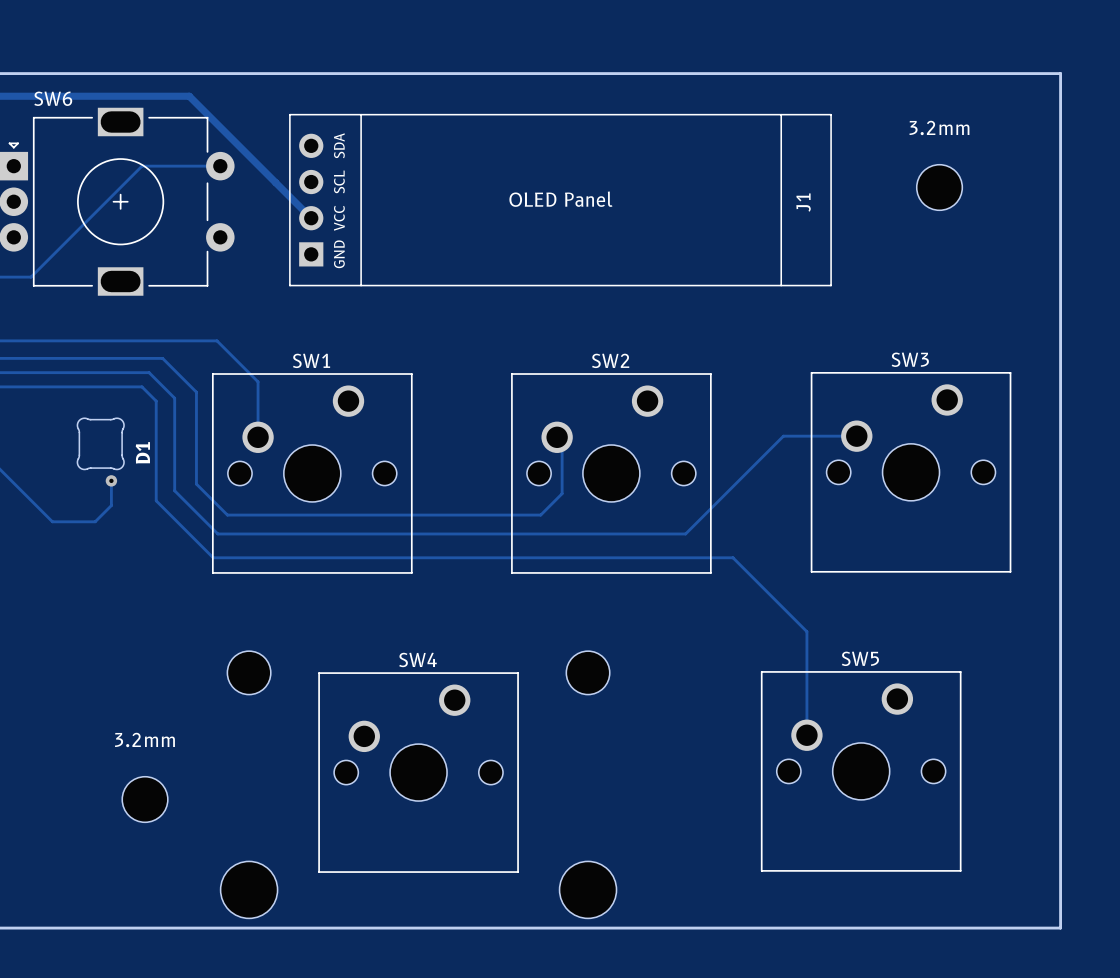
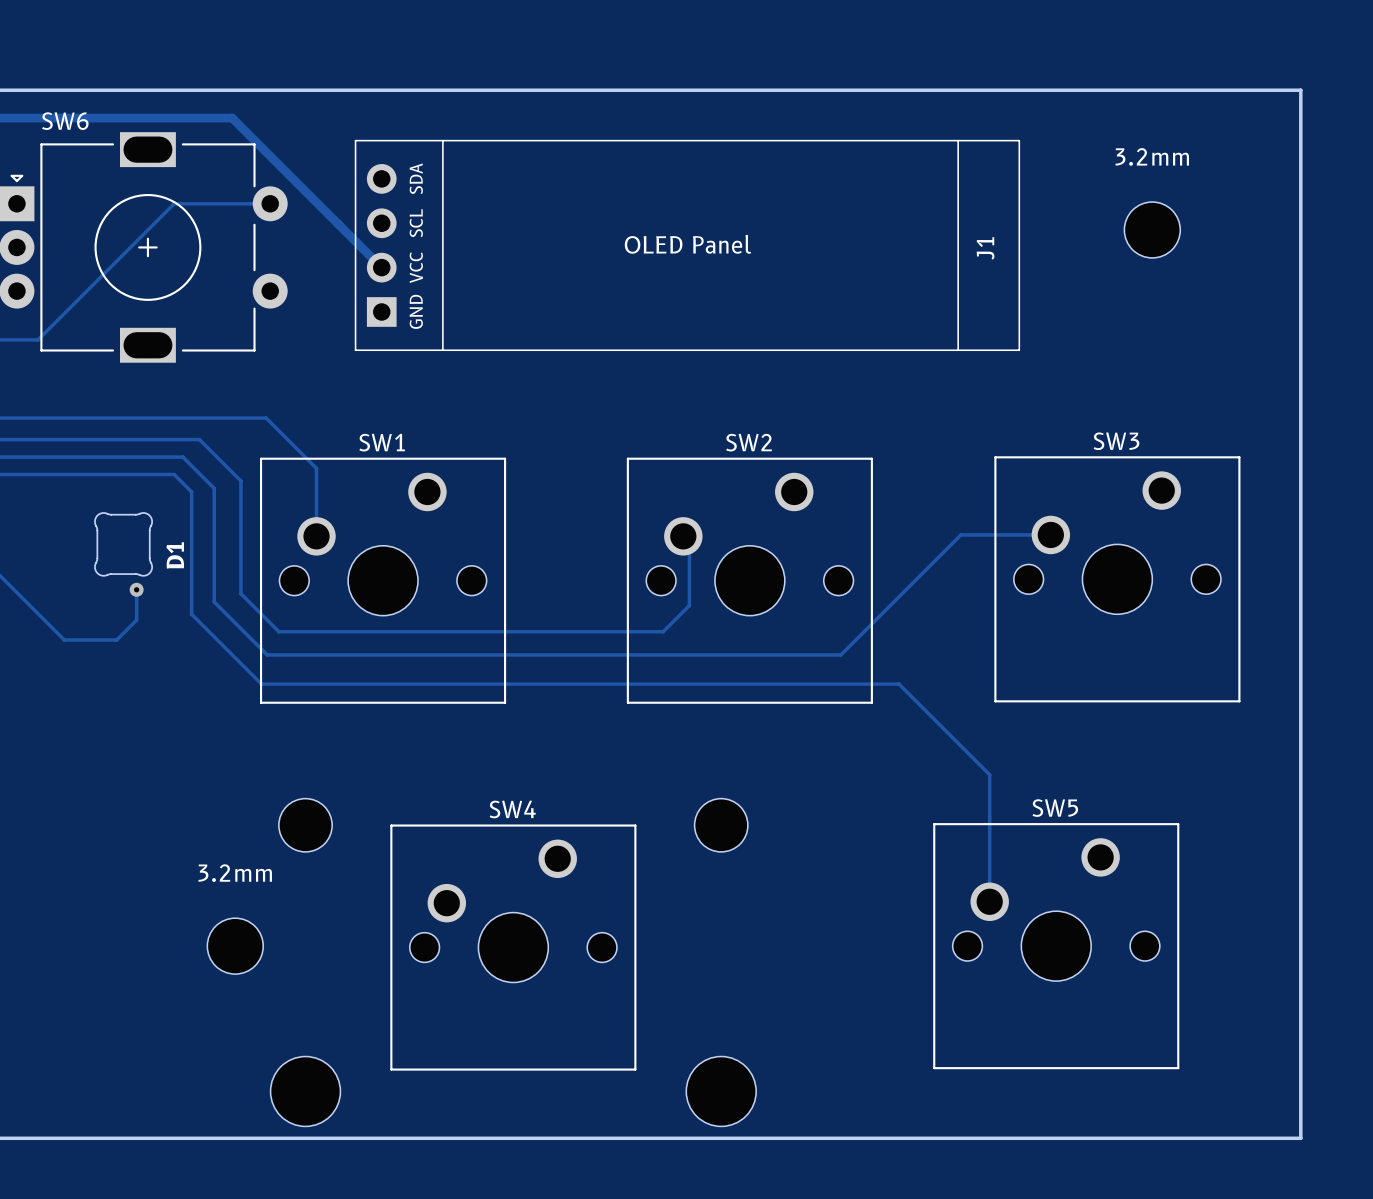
3.2mm position: (145, 799) -> (235, 946)

